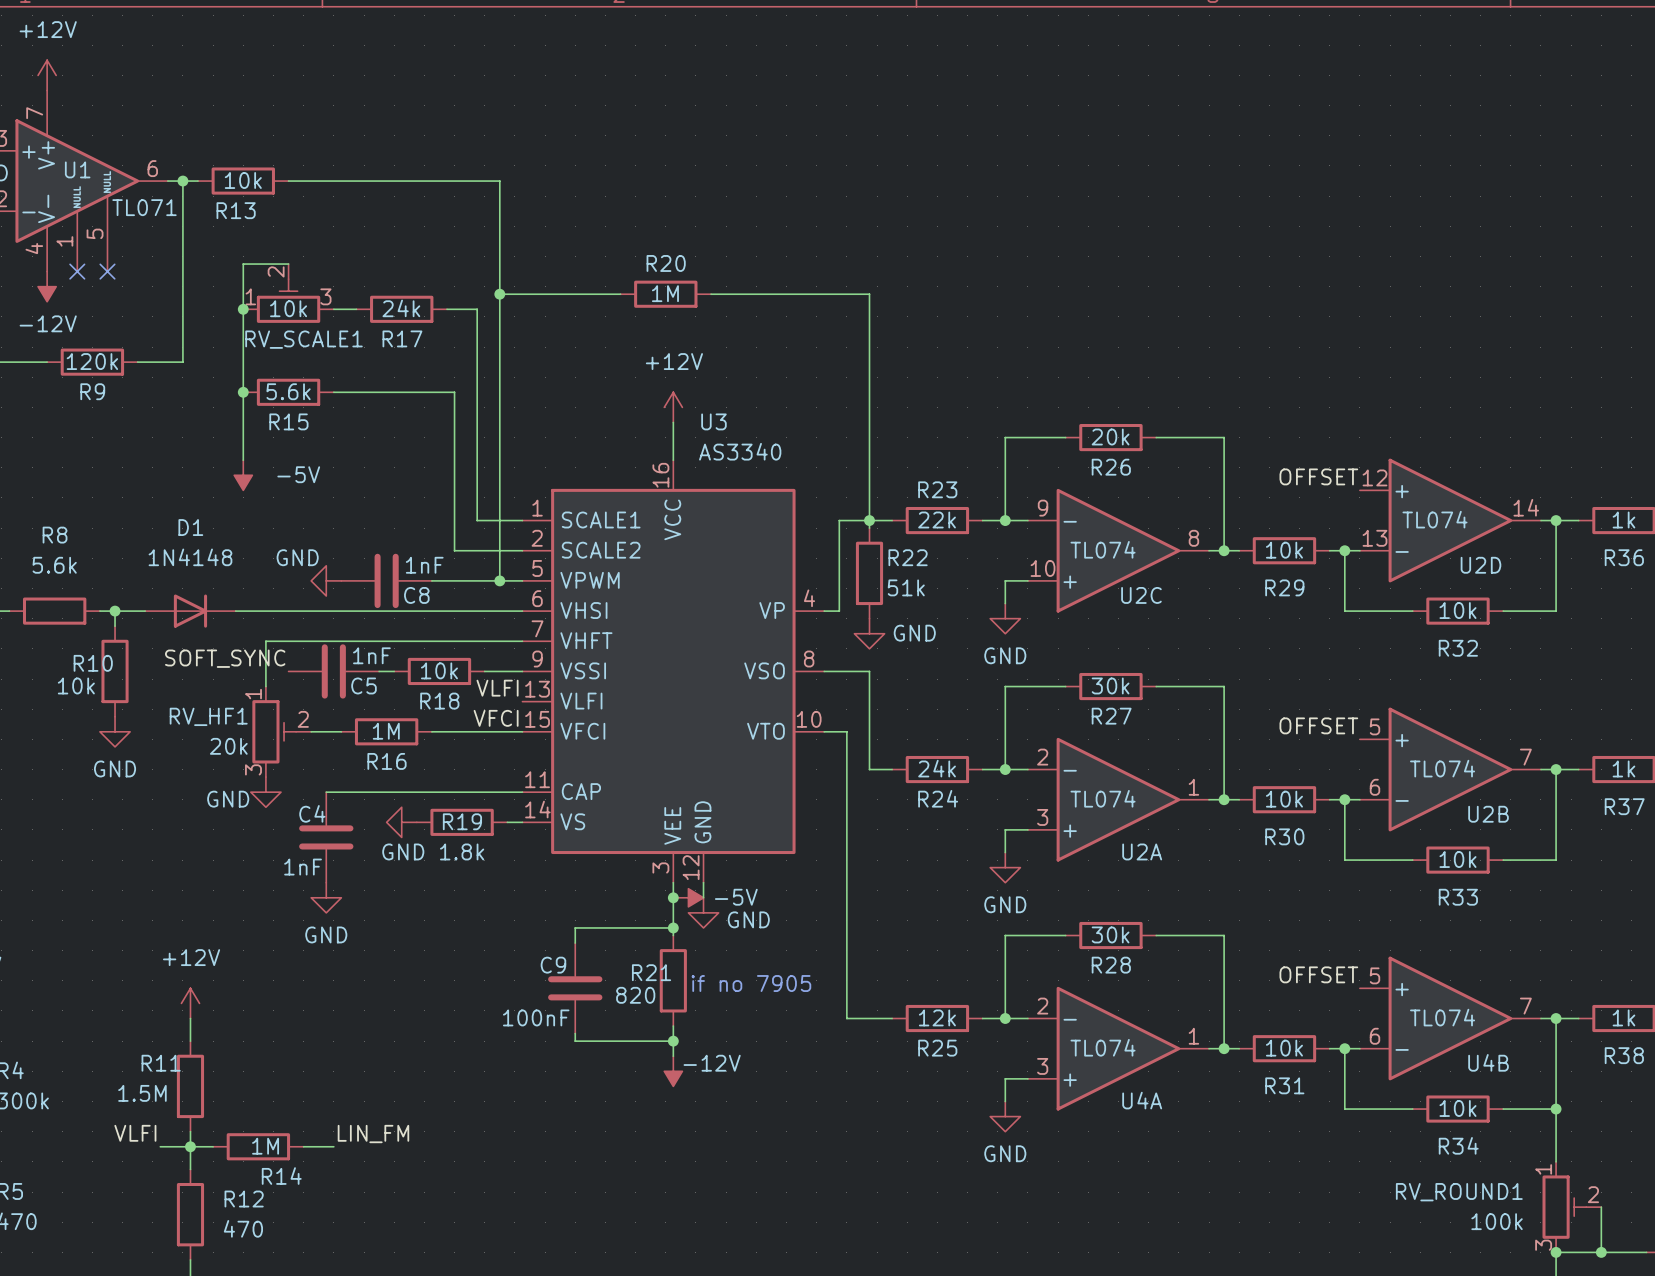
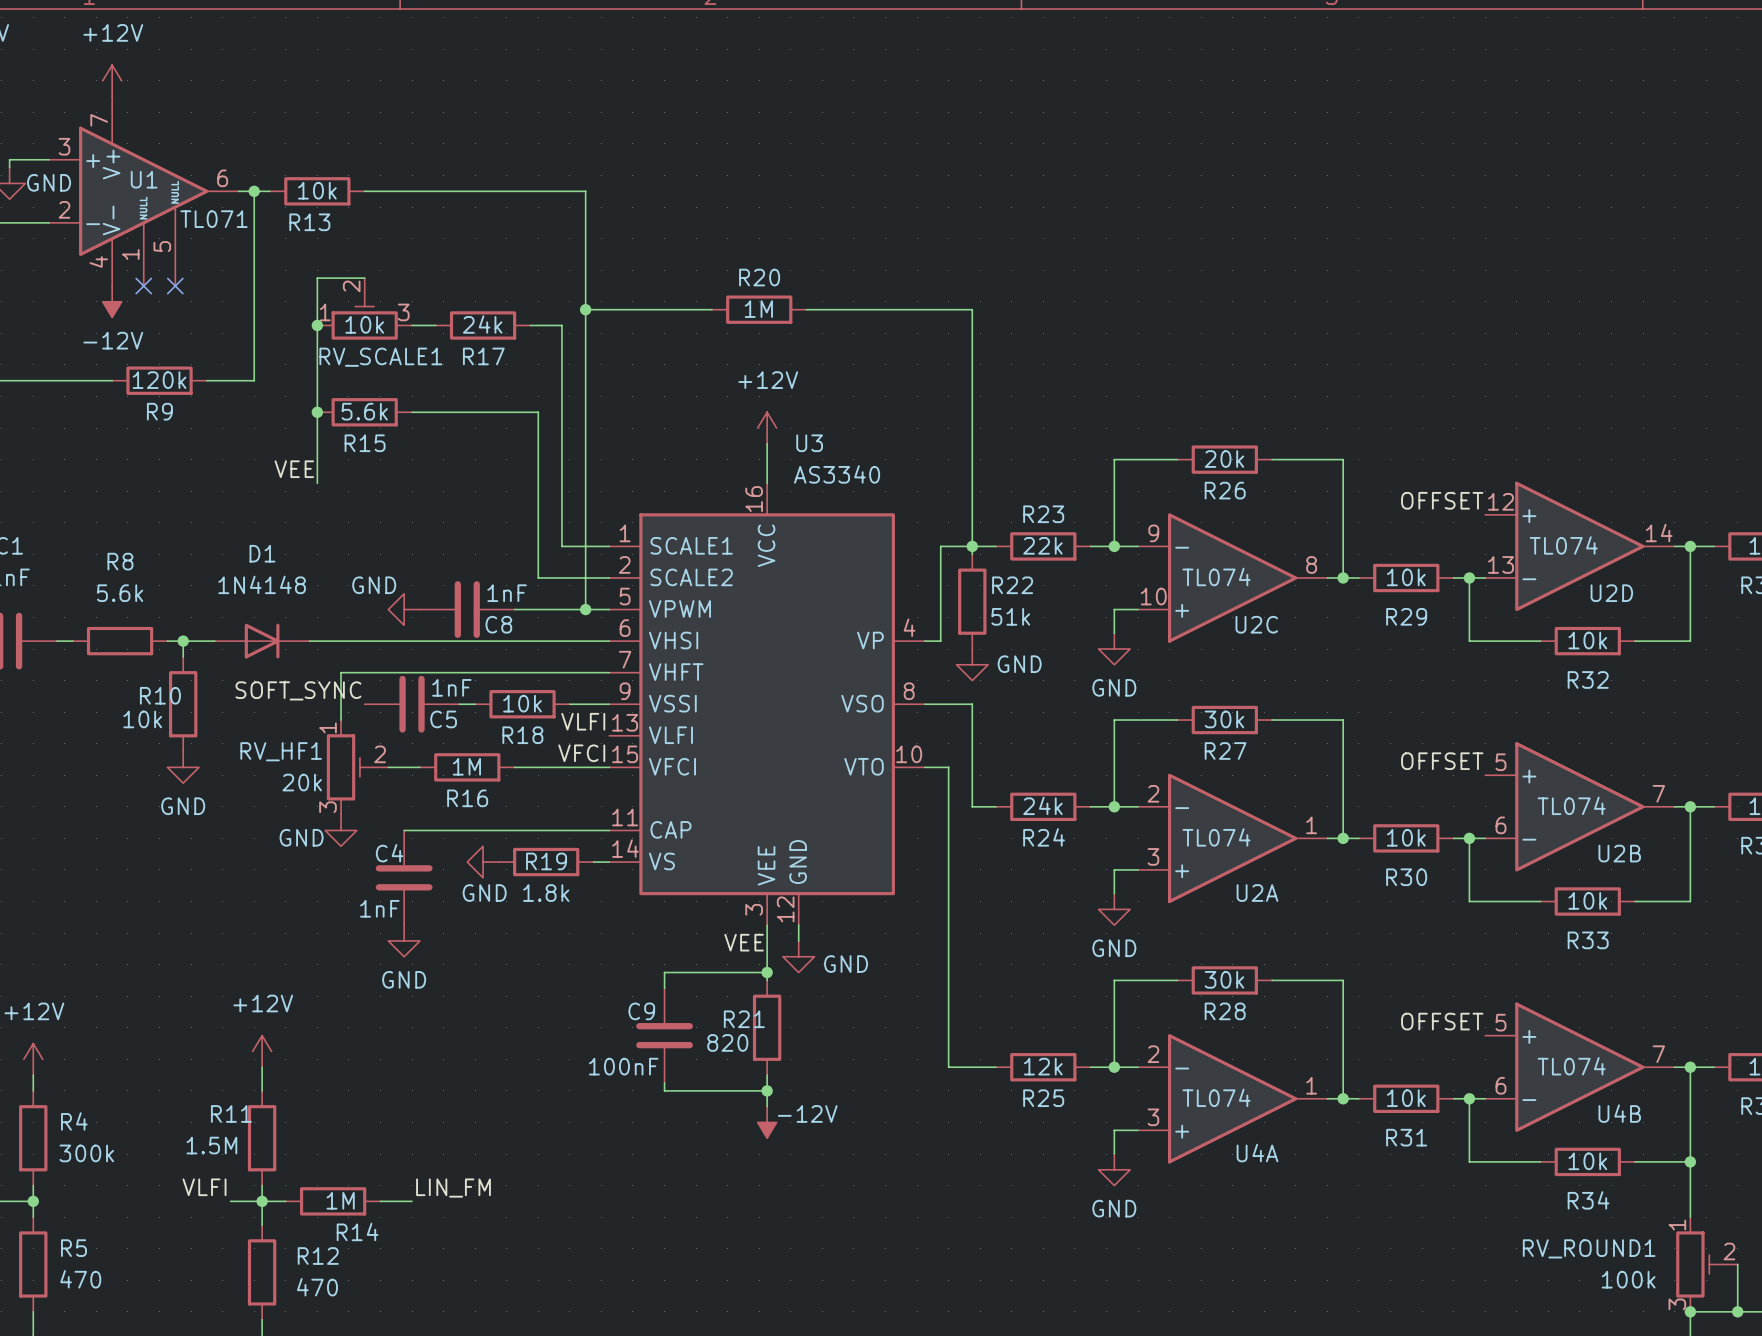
label: none -> VEE (294, 469)
power symbol: -5V (243, 475) -> none
junction: (673, 897) -> none
power symbol: -5V (688, 897) -> none
label: none -> VEE (744, 942)
text: if no 7905 (751, 983) -> none

